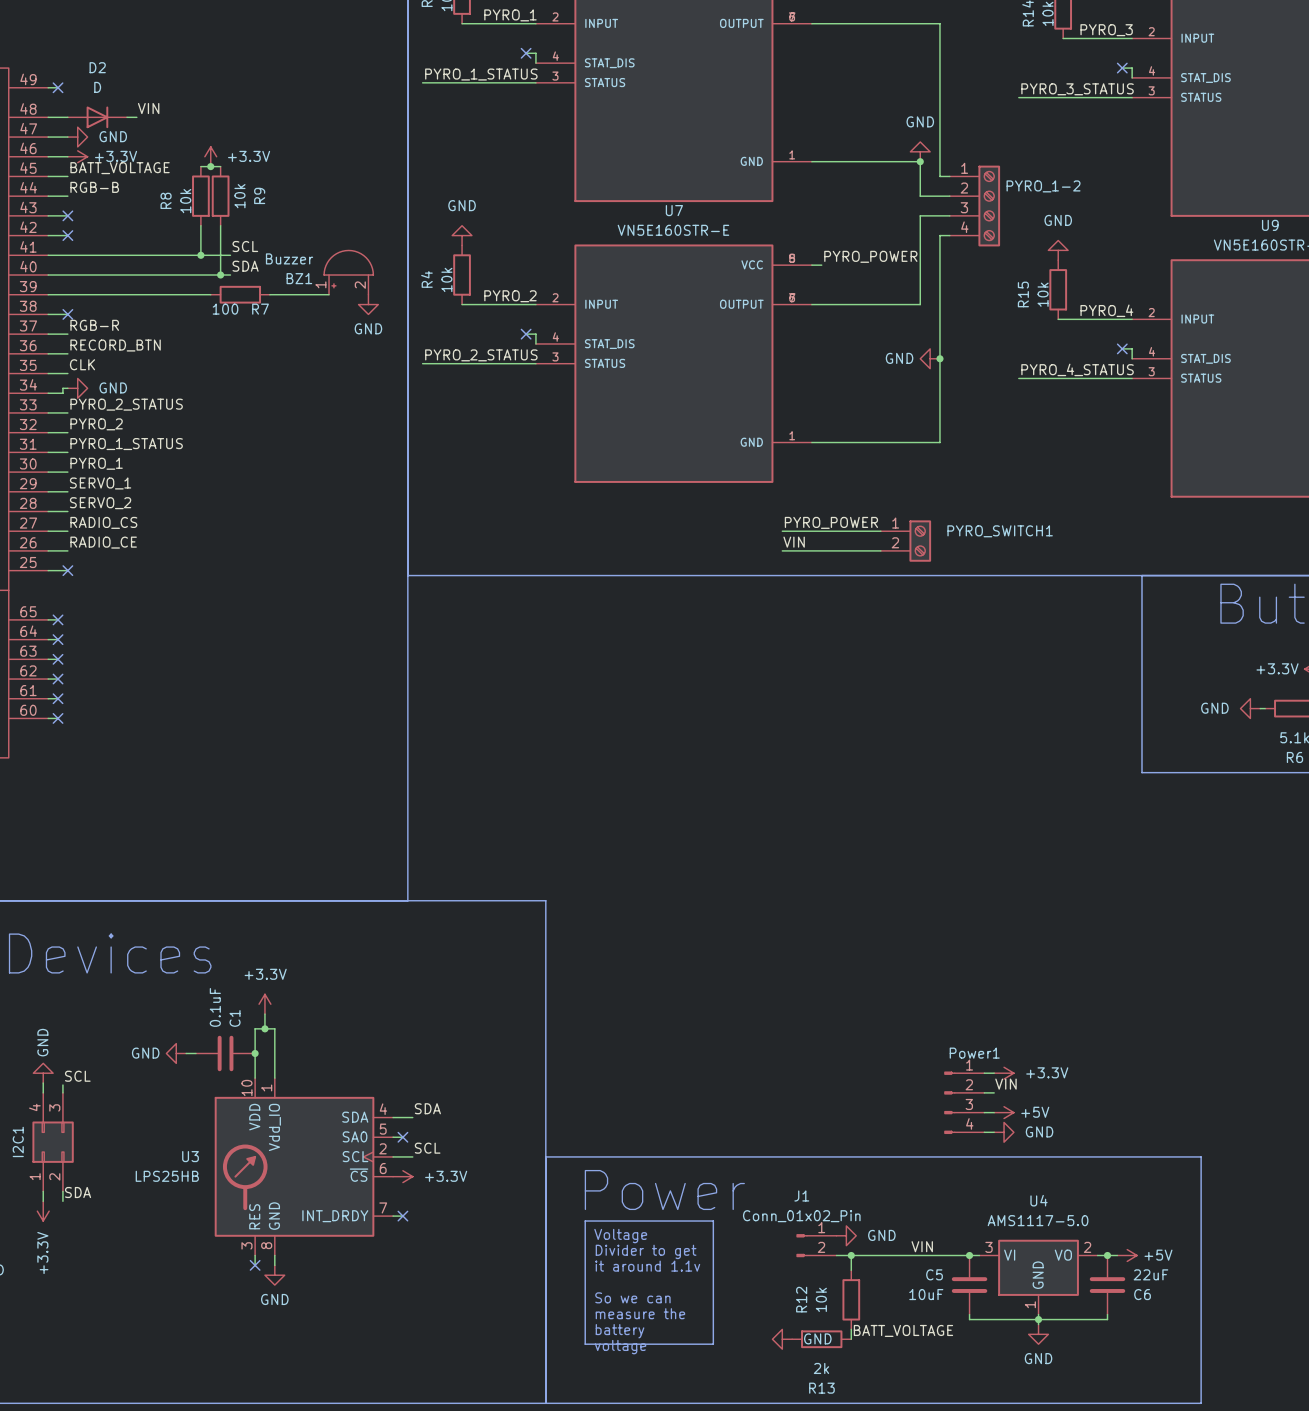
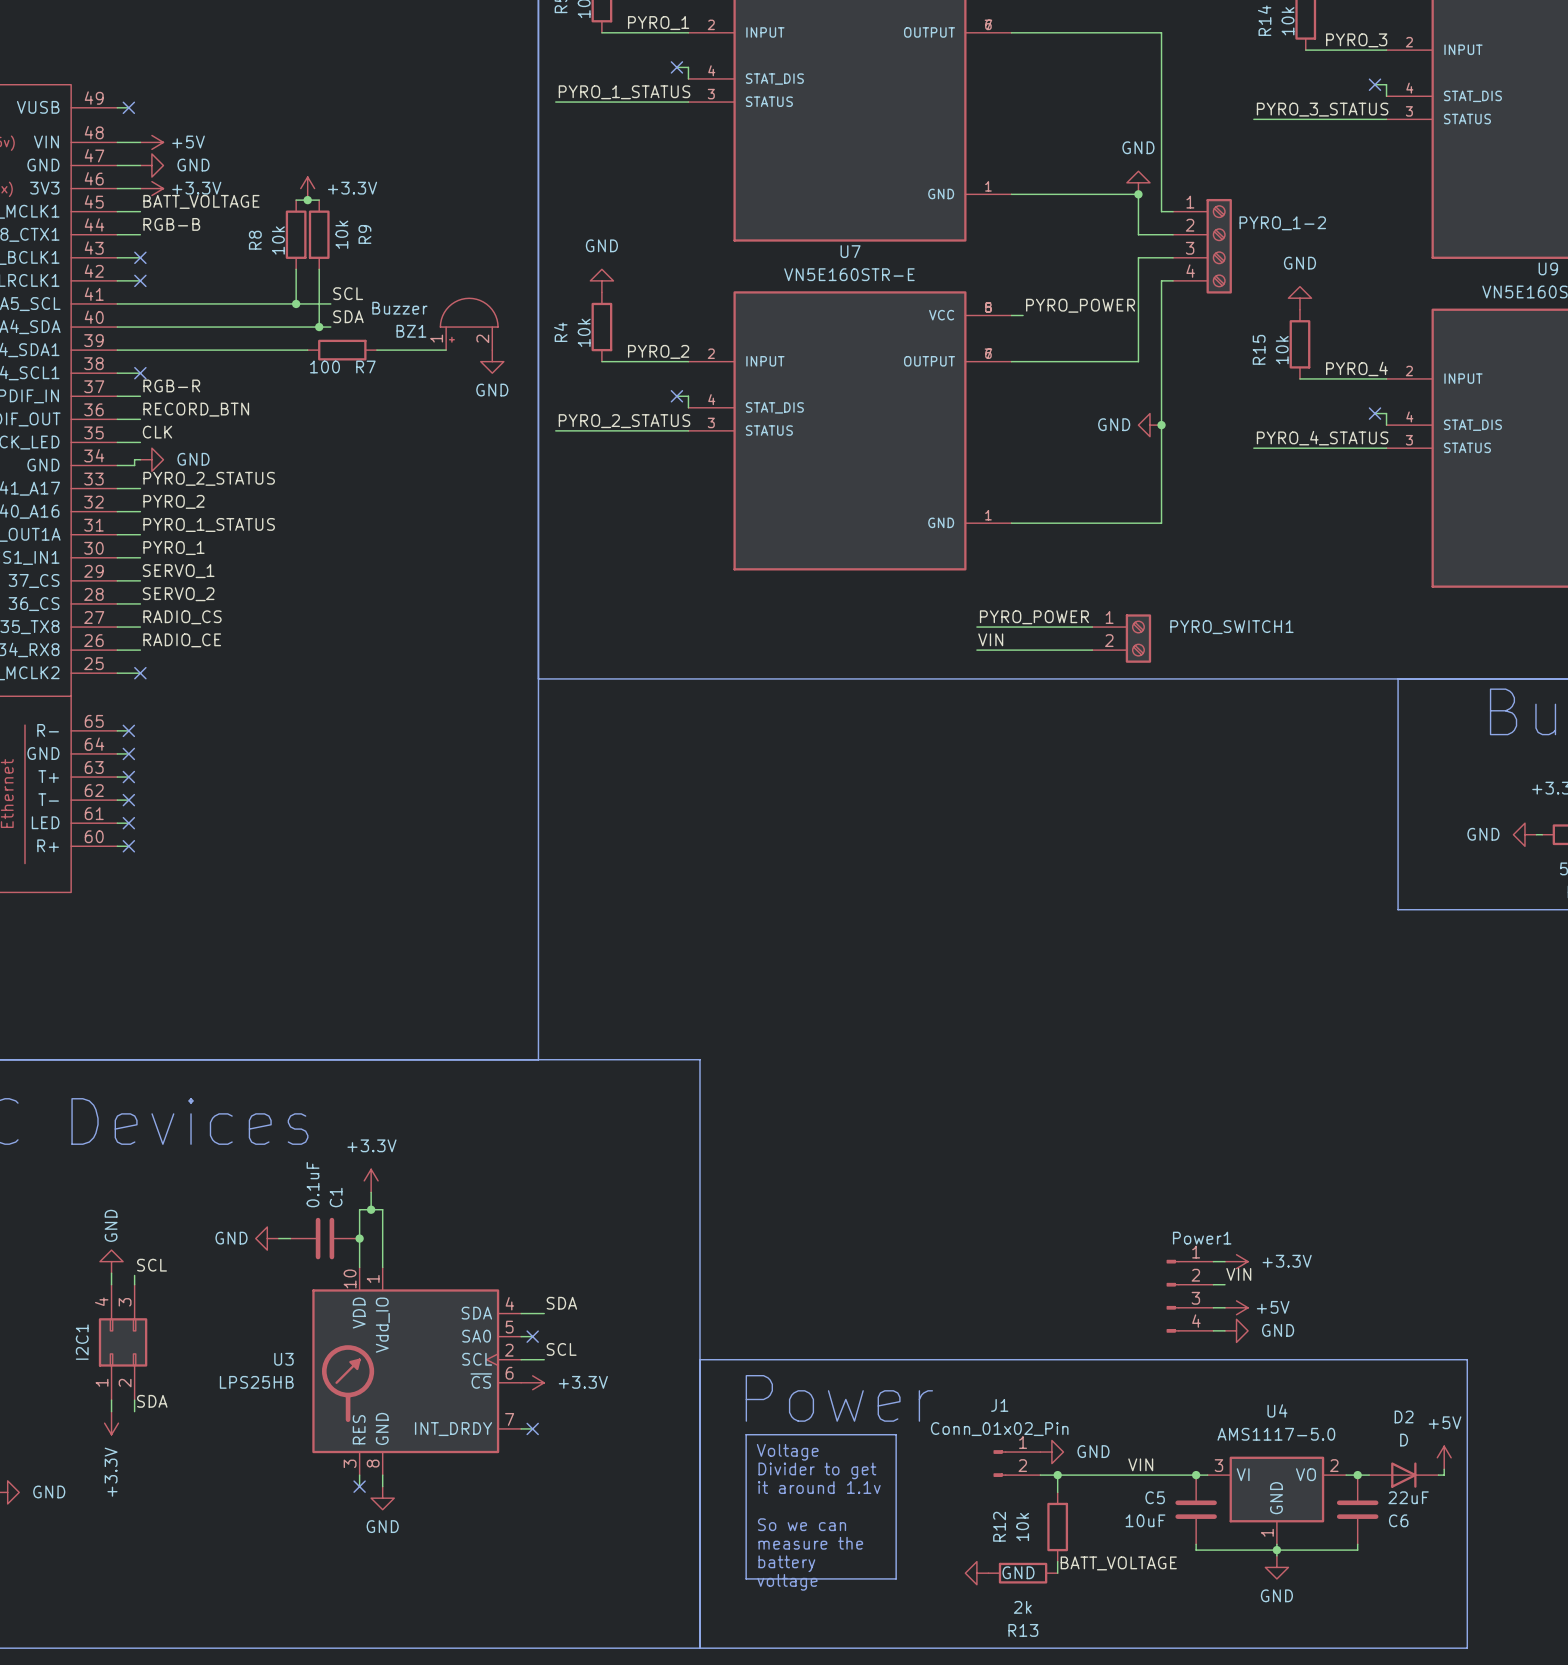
label: VIN (148, 108) -> none
power symbol: none -> +5V (151, 142)
D2 position: (97, 117) -> (1403, 1475)
wire: (127, 117) (136, 117) -> none
wire: none -> (1444, 1469) (1444, 1475) (1438, 1475)
power symbol rotation: 0° (1127, 1255) -> 90° counterclockwise (1444, 1457)
power symbol position: +5V (1127, 1255) -> +5V (1444, 1457)

